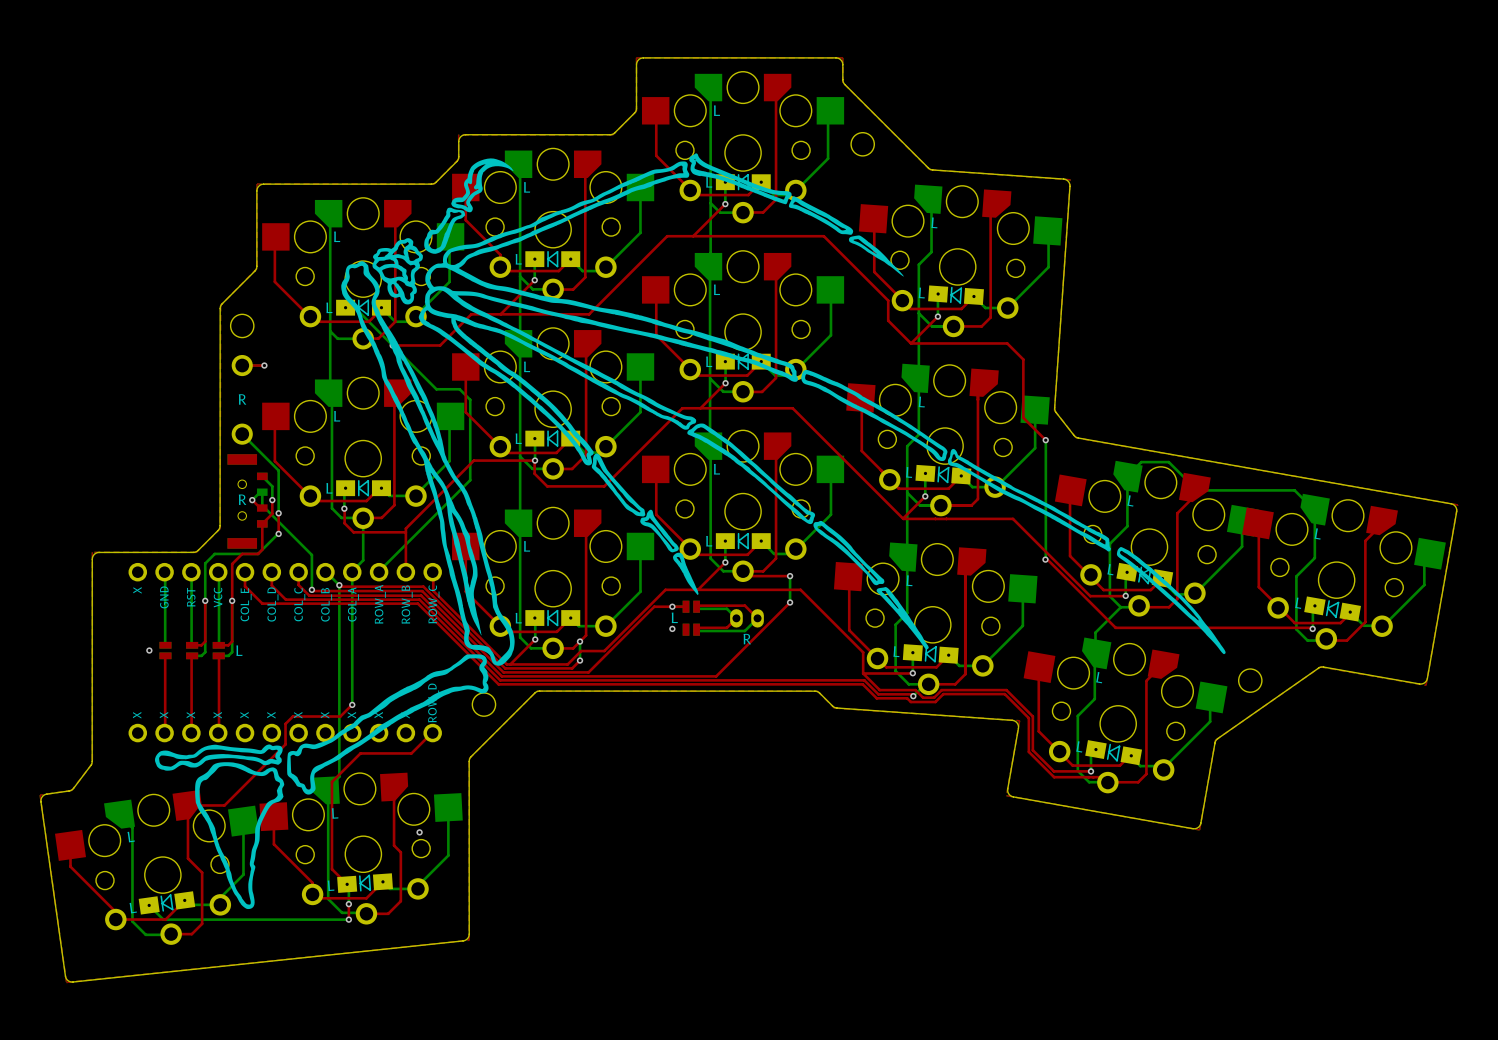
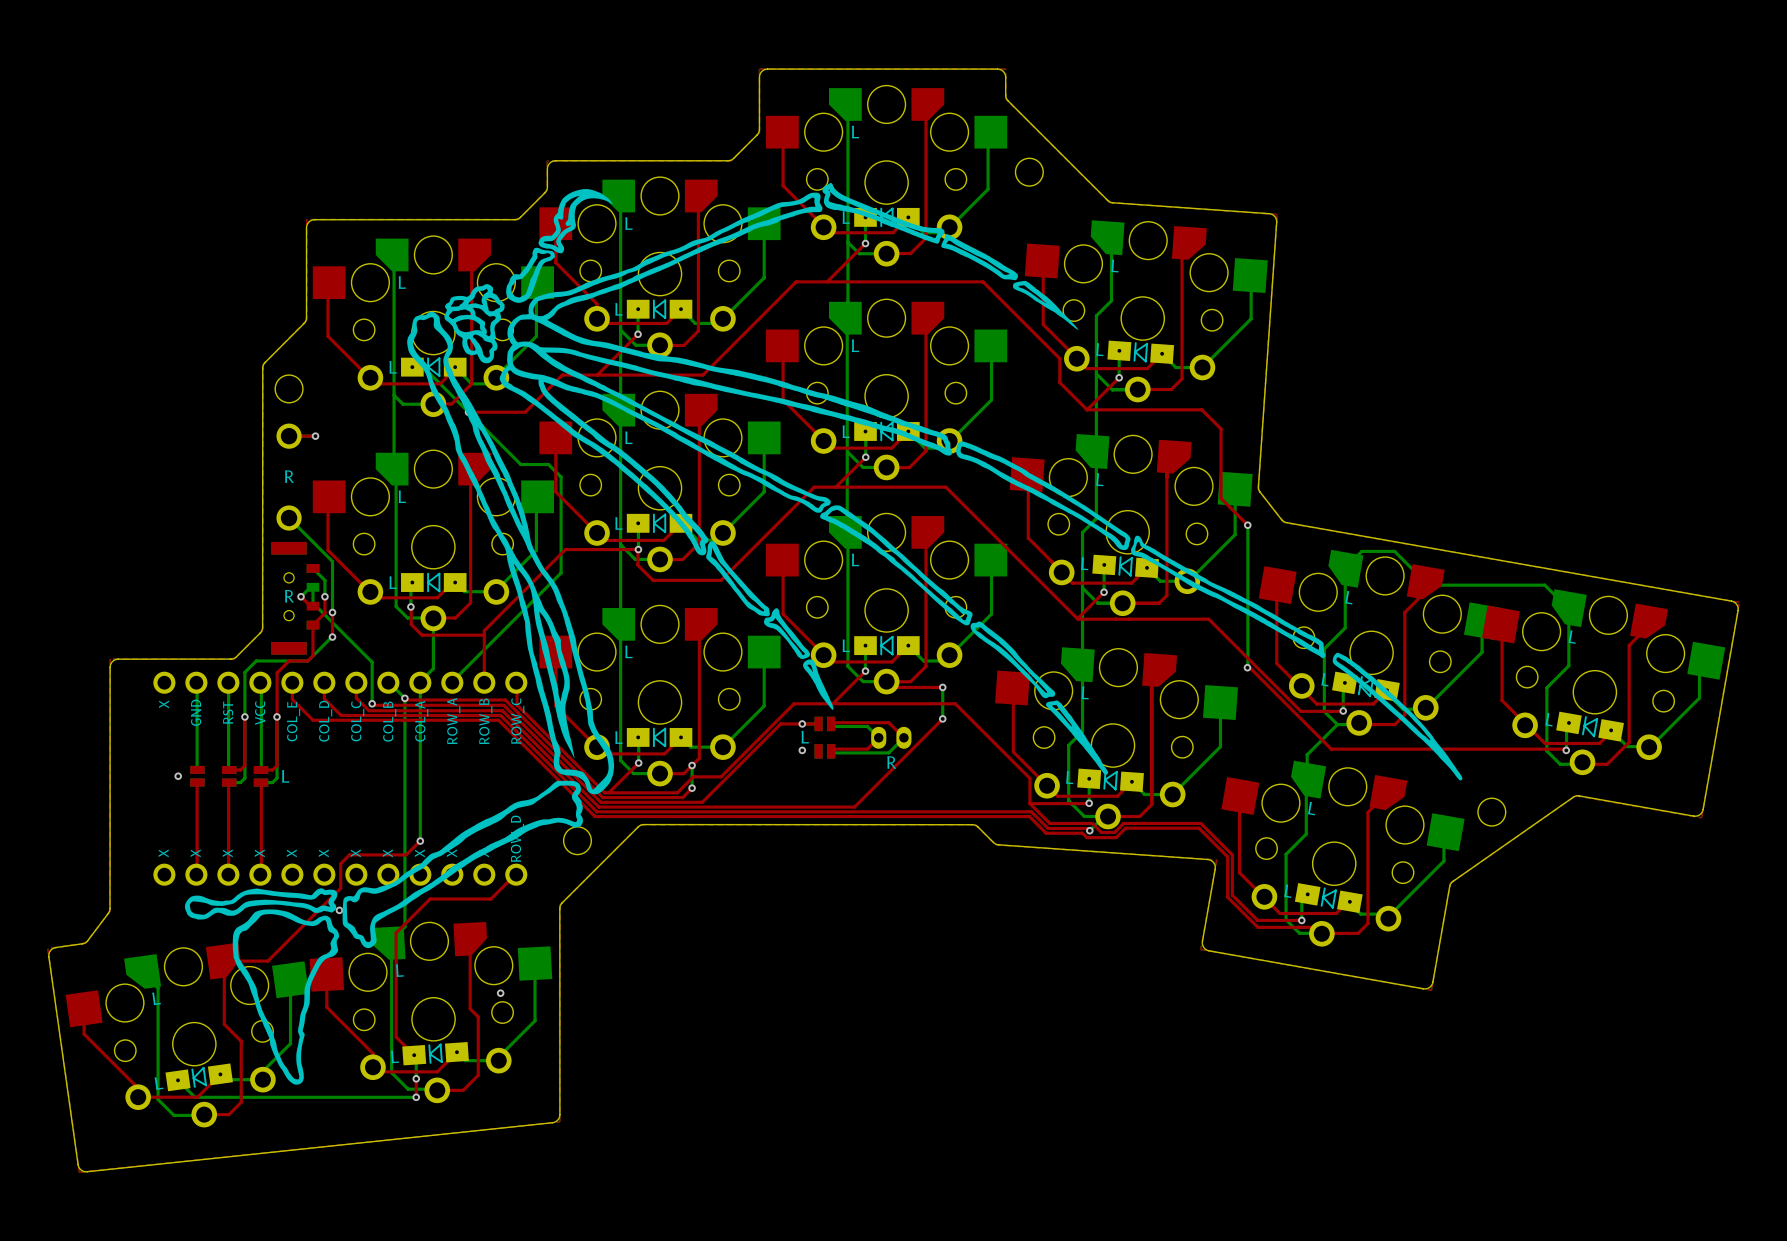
via: none -> (339, 910)

